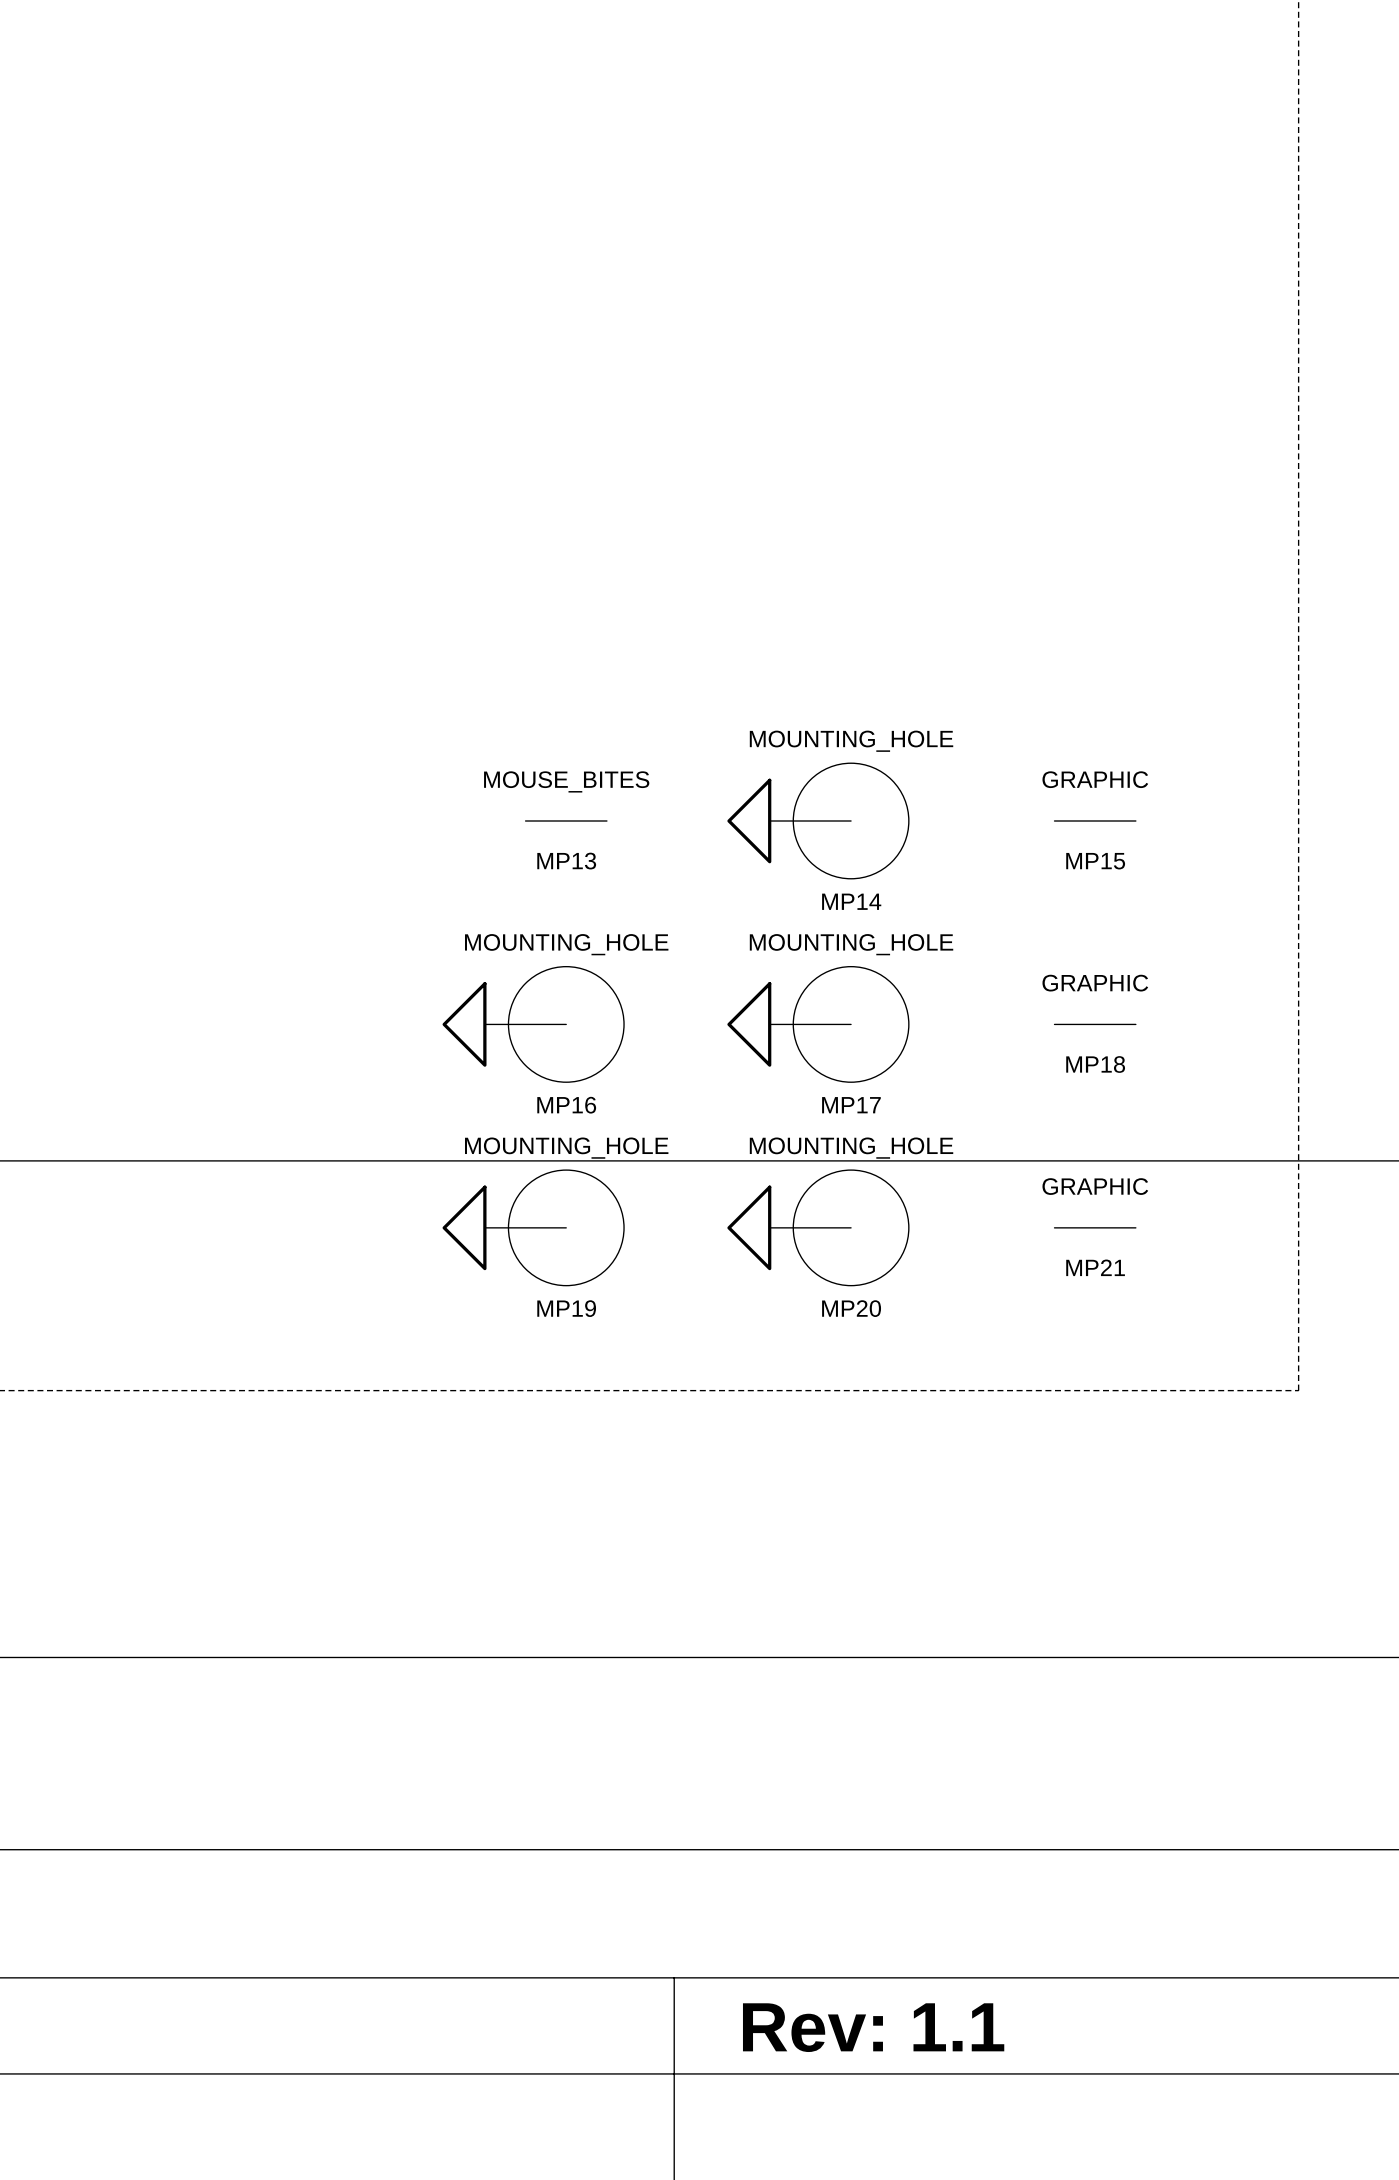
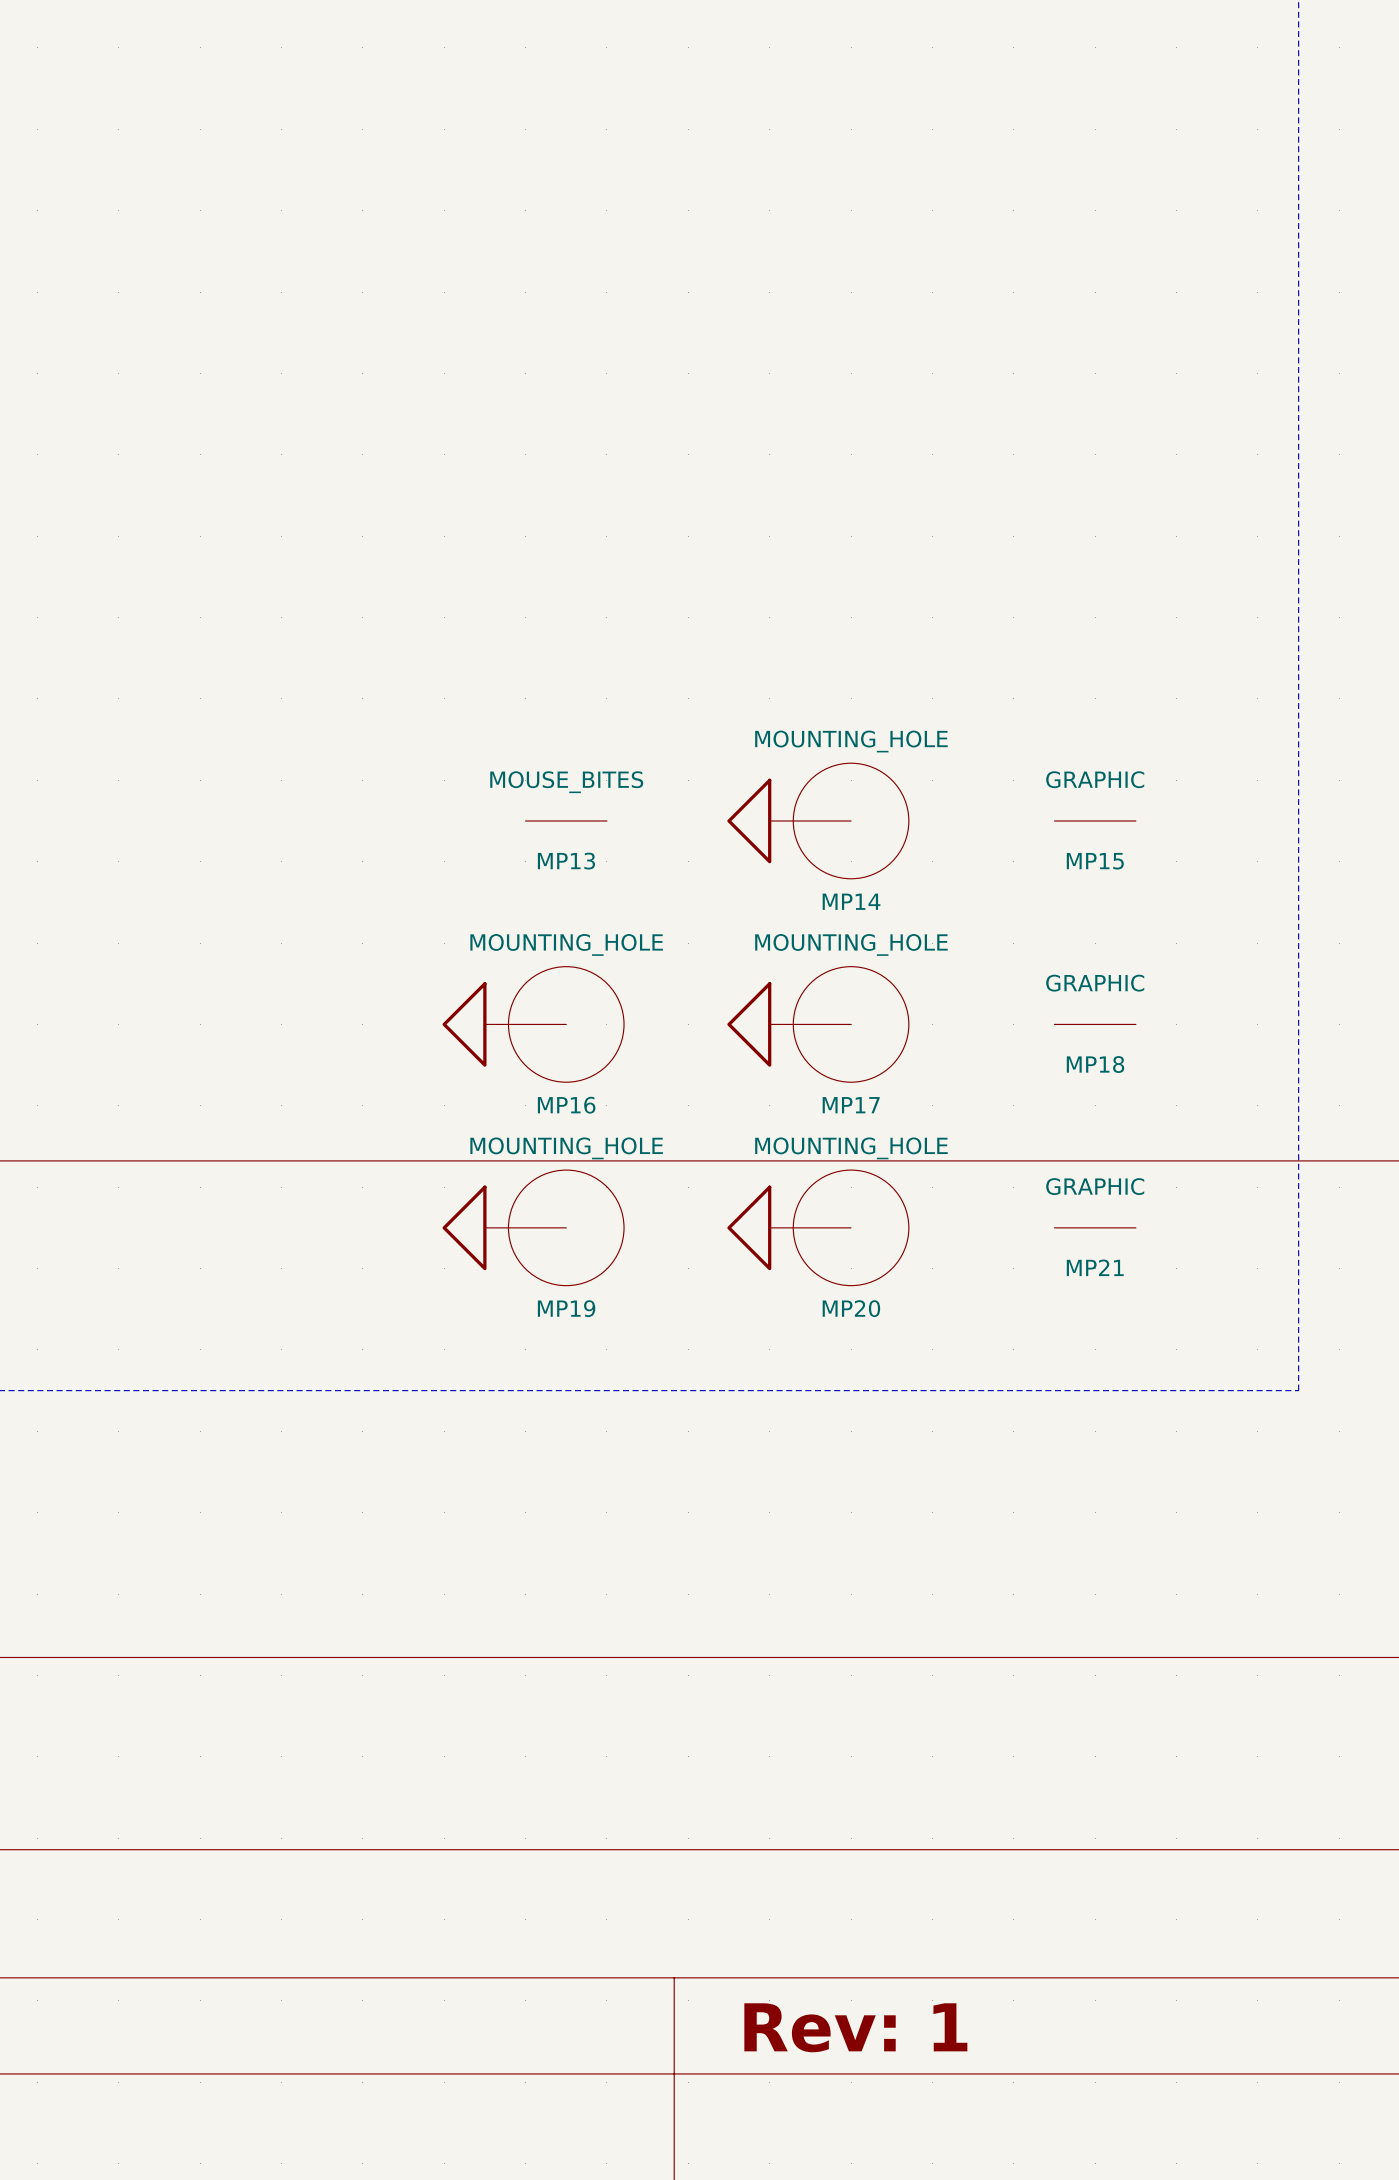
title block: Rev: 1.1 (873, 2027) -> Rev: 1 (855, 2027)

